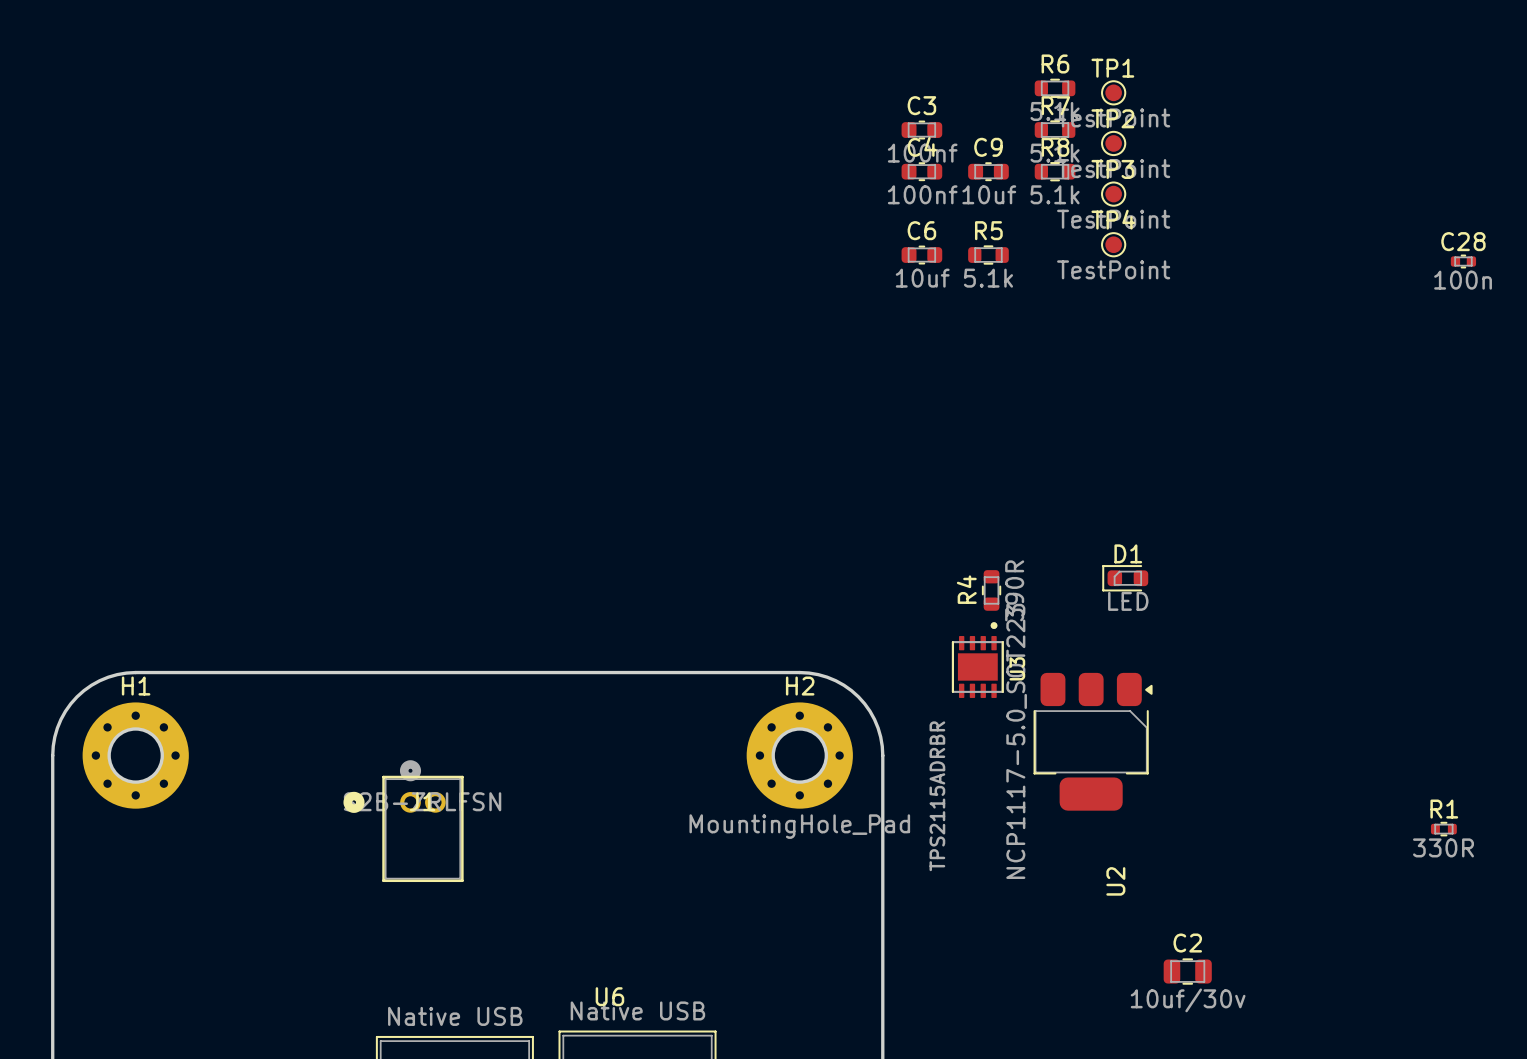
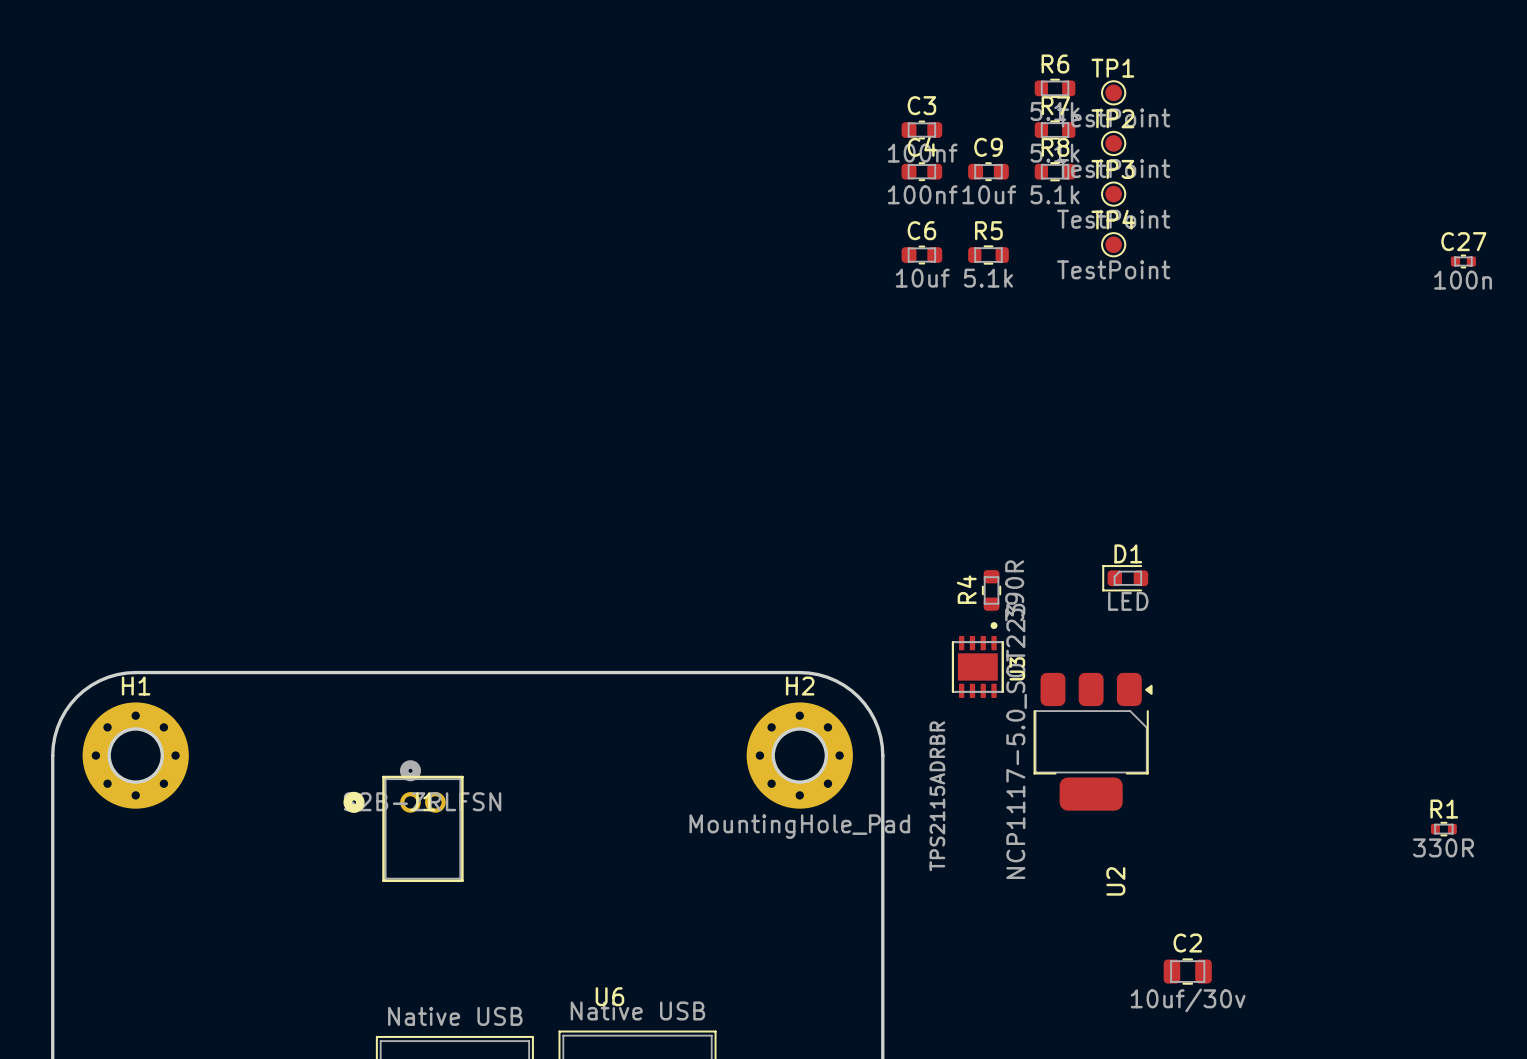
C28 name: C28 (1463, 241) -> C27 (1463, 241)

